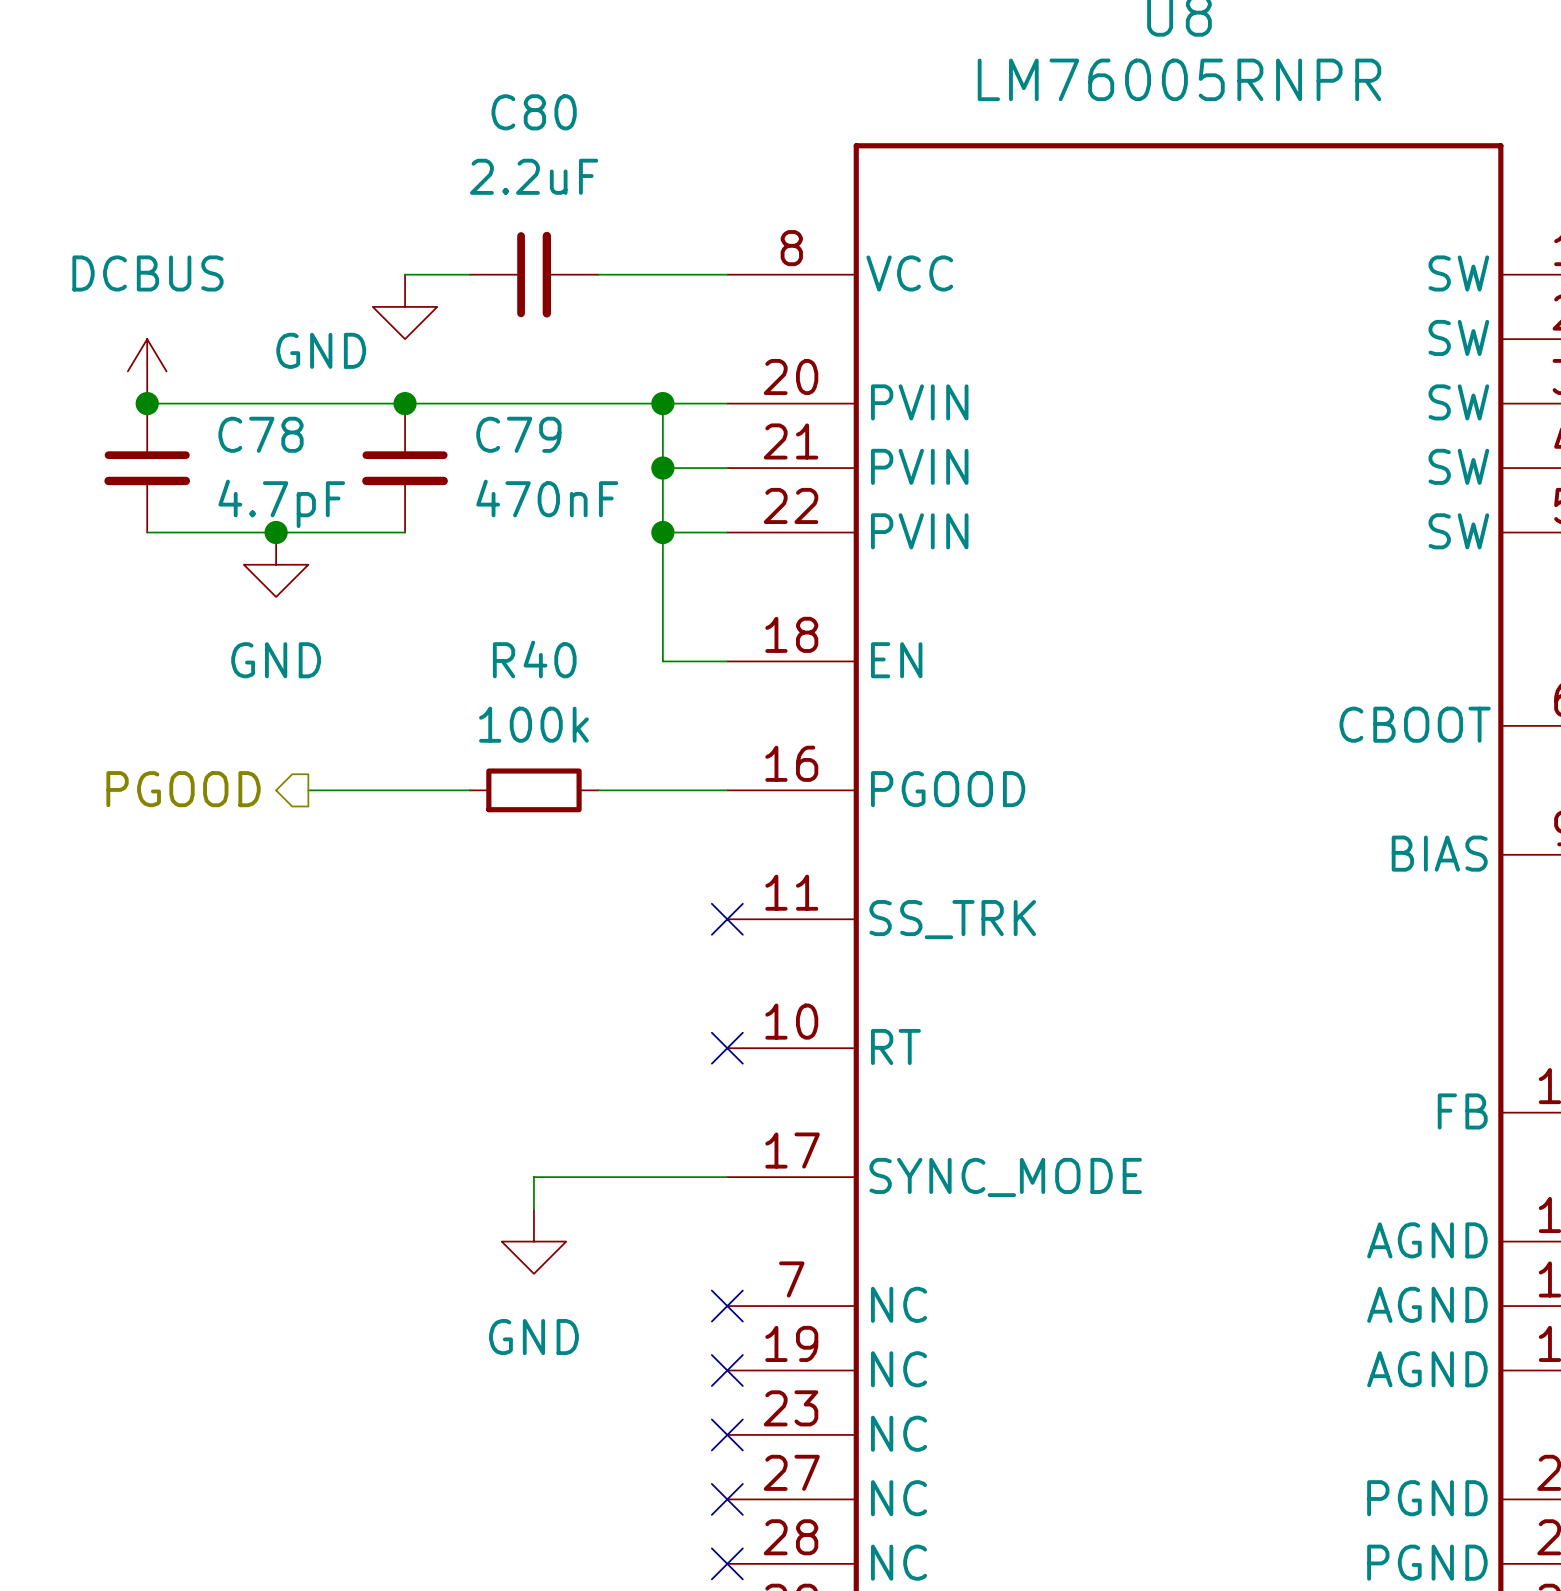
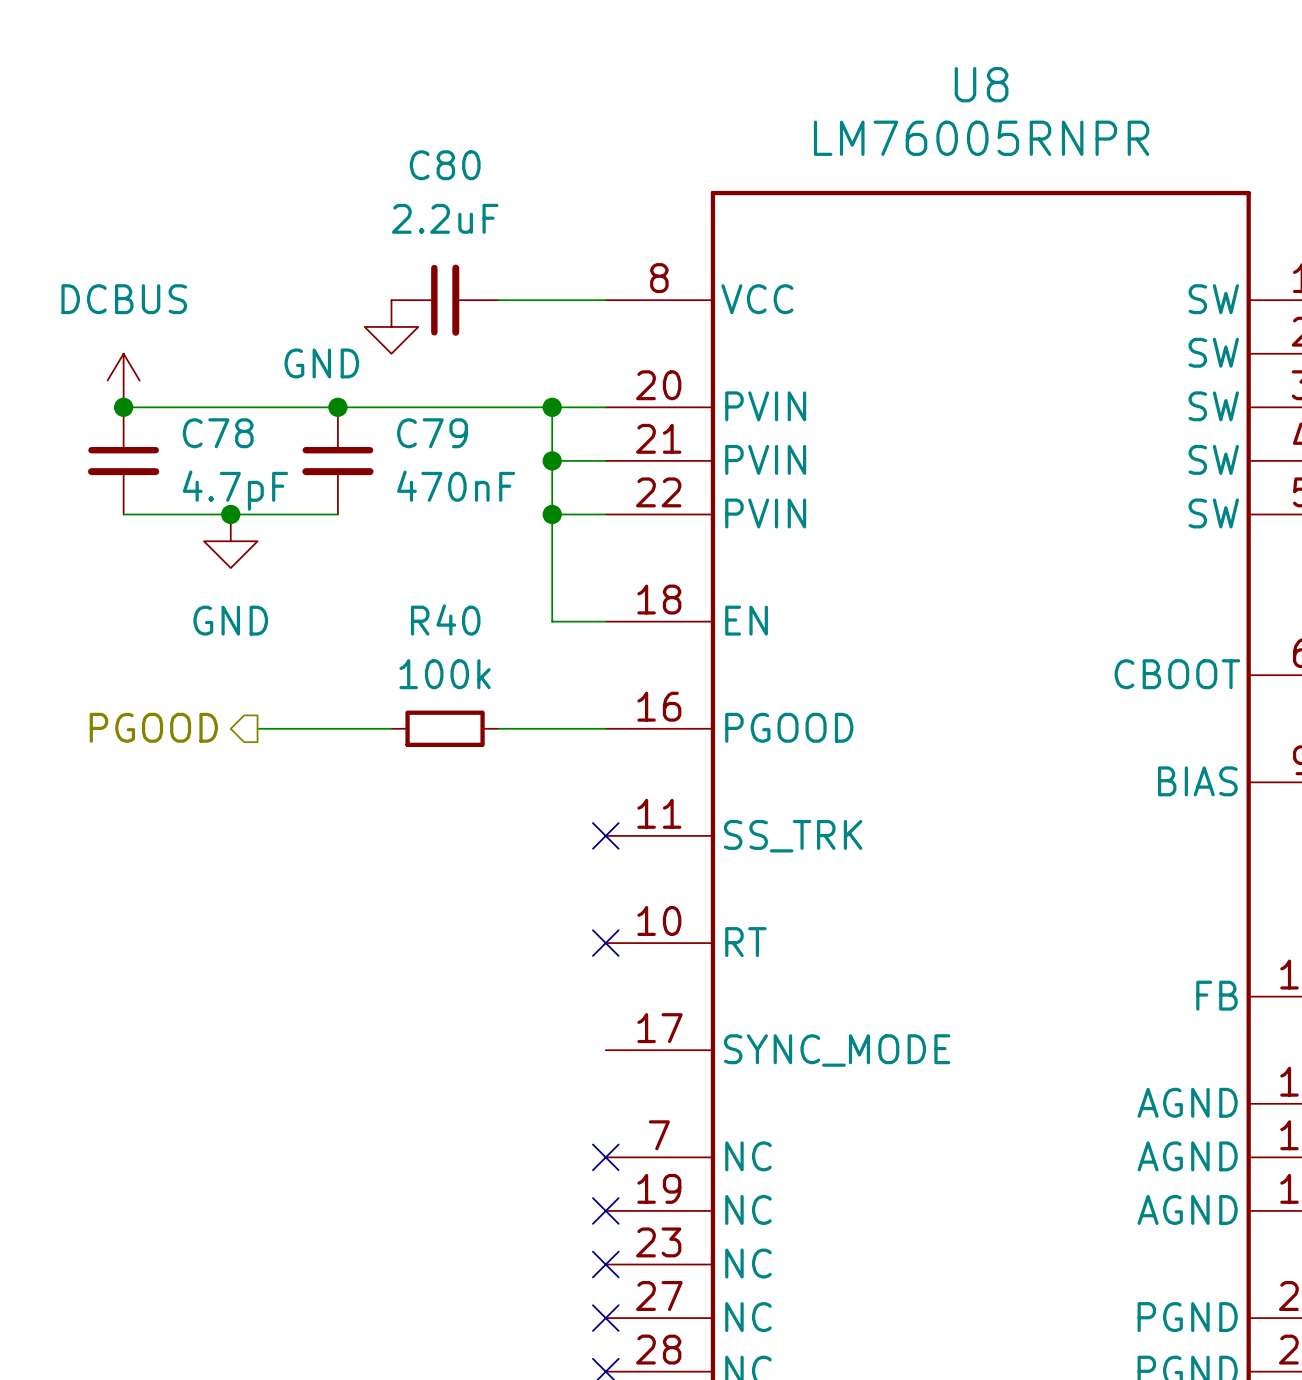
wire: (405, 274) (469, 274) -> none
power symbol position: GND (405, 306) -> GND (391, 326)
wire: (727, 1177) (533, 1177) (533, 1209) -> none
power symbol: GND (533, 1241) -> none

